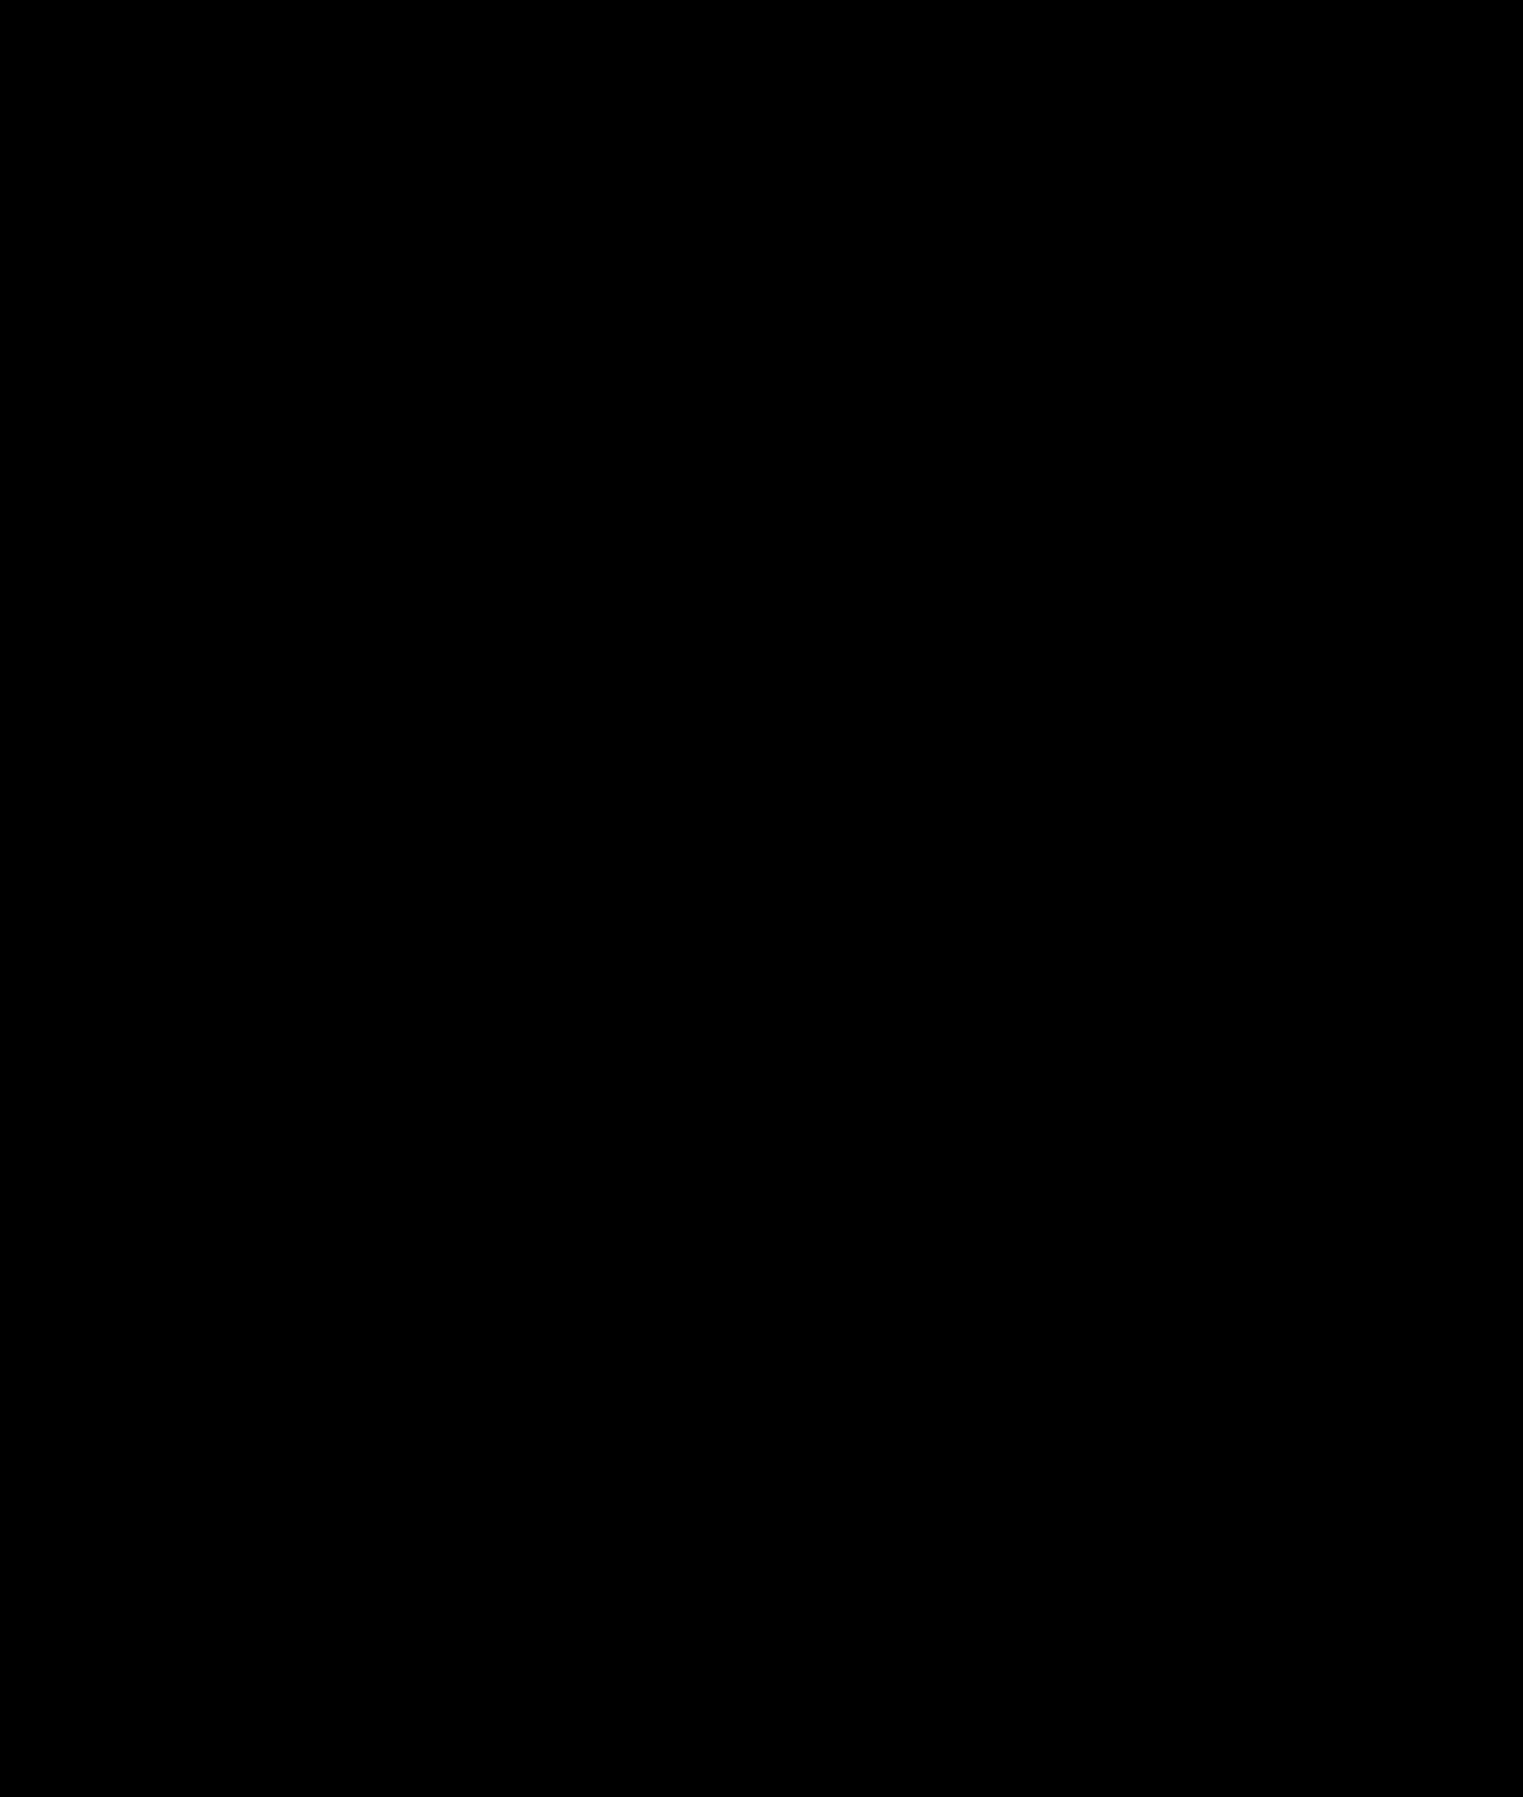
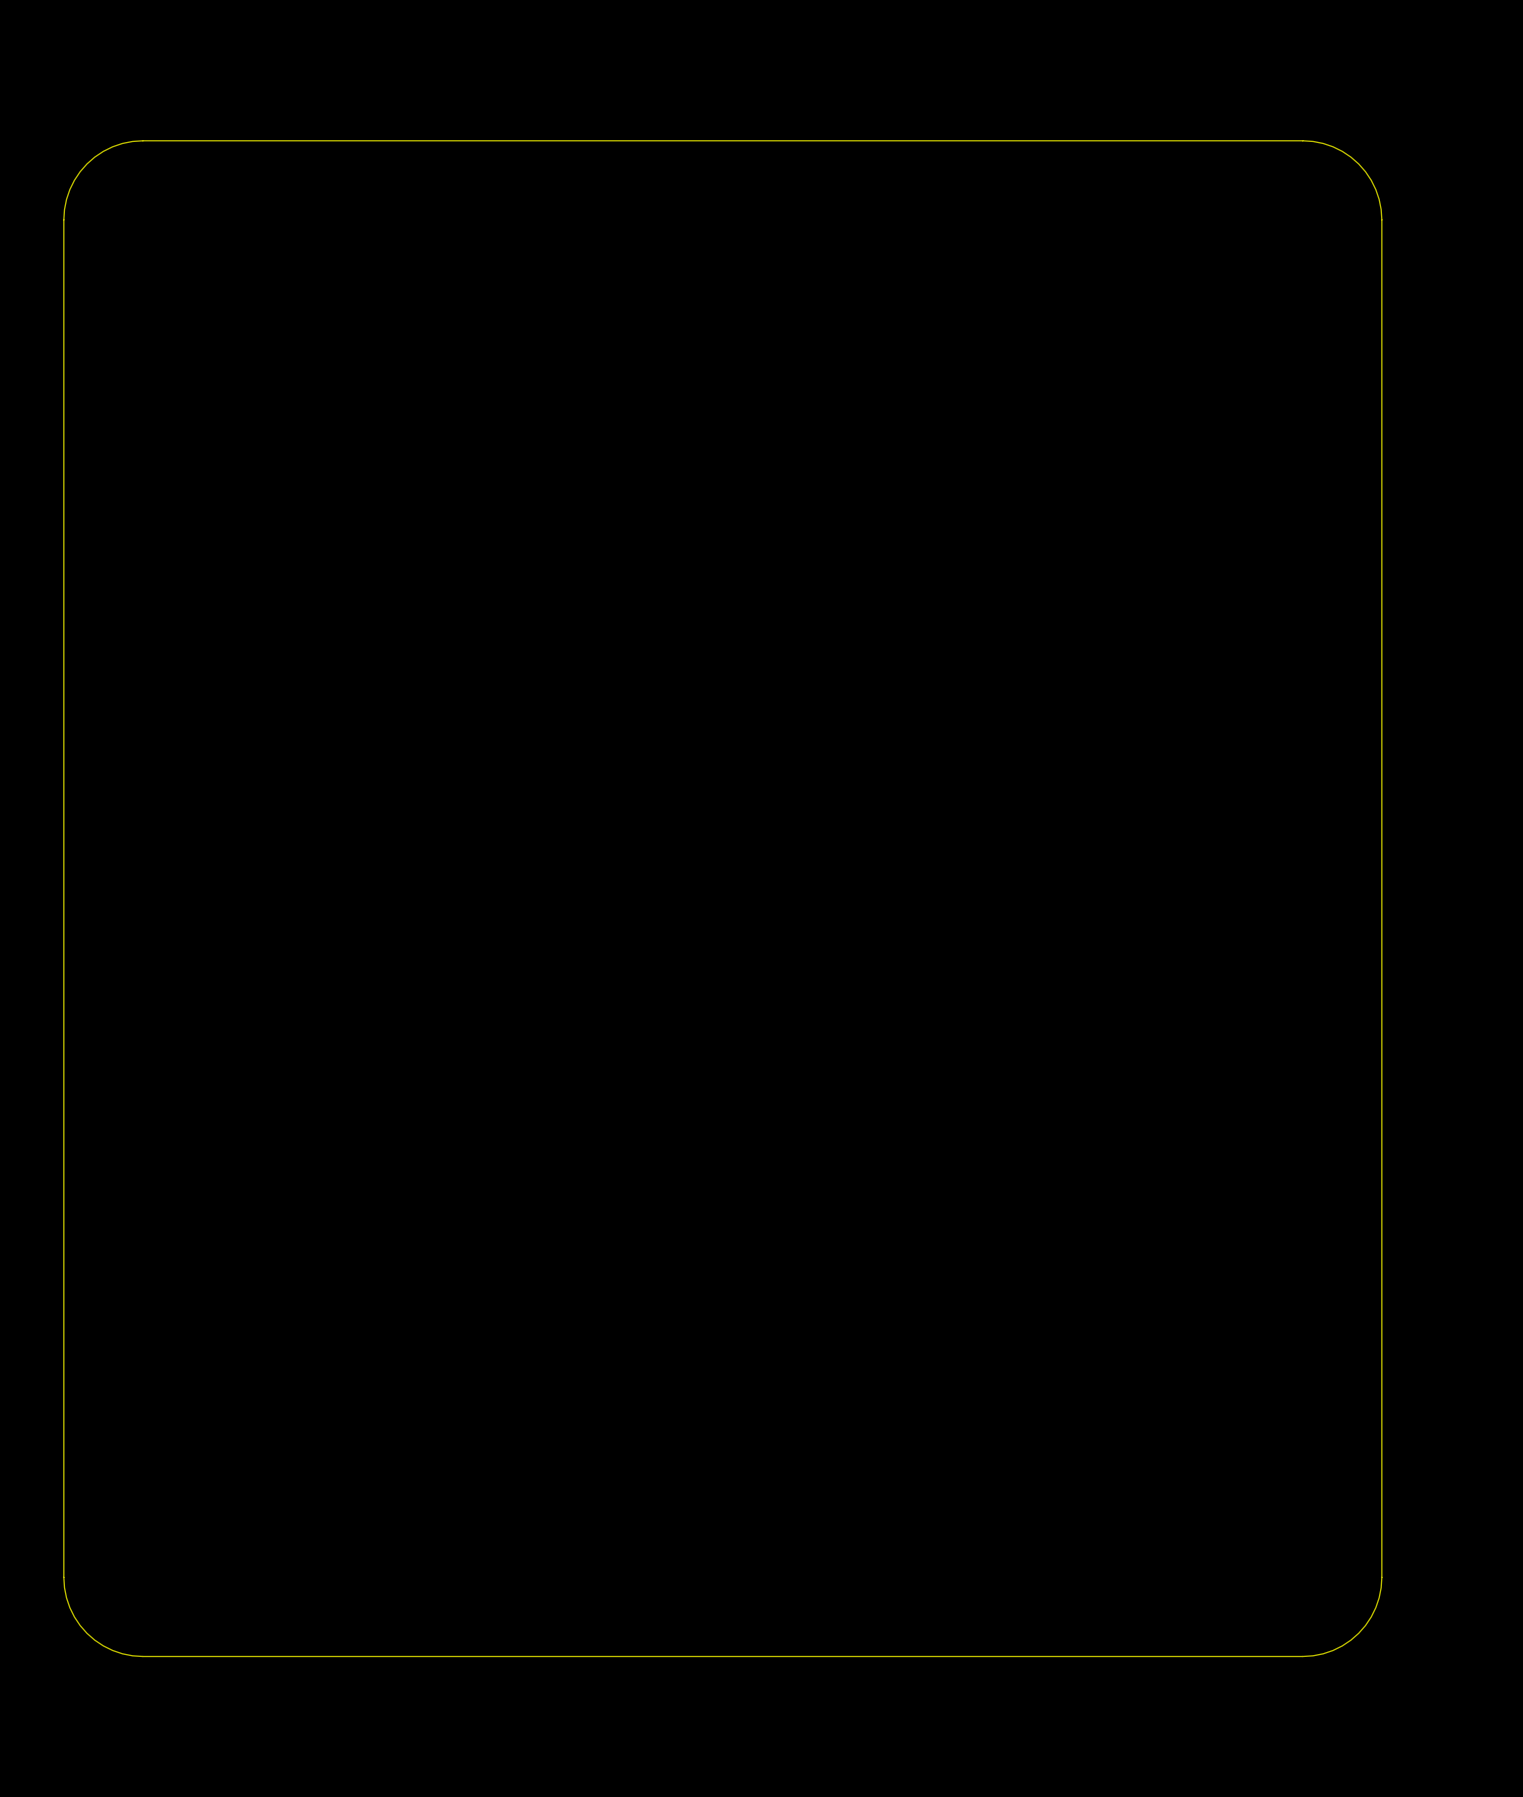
board edge: none -> (1302, 140) (142, 140) (122, 143) (103, 151) (80, 171) (66, 199) (63, 219) (63, 1577) (69, 1607) (80, 1625) (94, 1640) (122, 1653) (142, 1656) (1302, 1656) (1333, 1650) (1350, 1640) (1365, 1625) (1379, 1597) (1381, 1577) (1381, 219) (1375, 189) (1358, 163) (1333, 146) (1302, 140)

